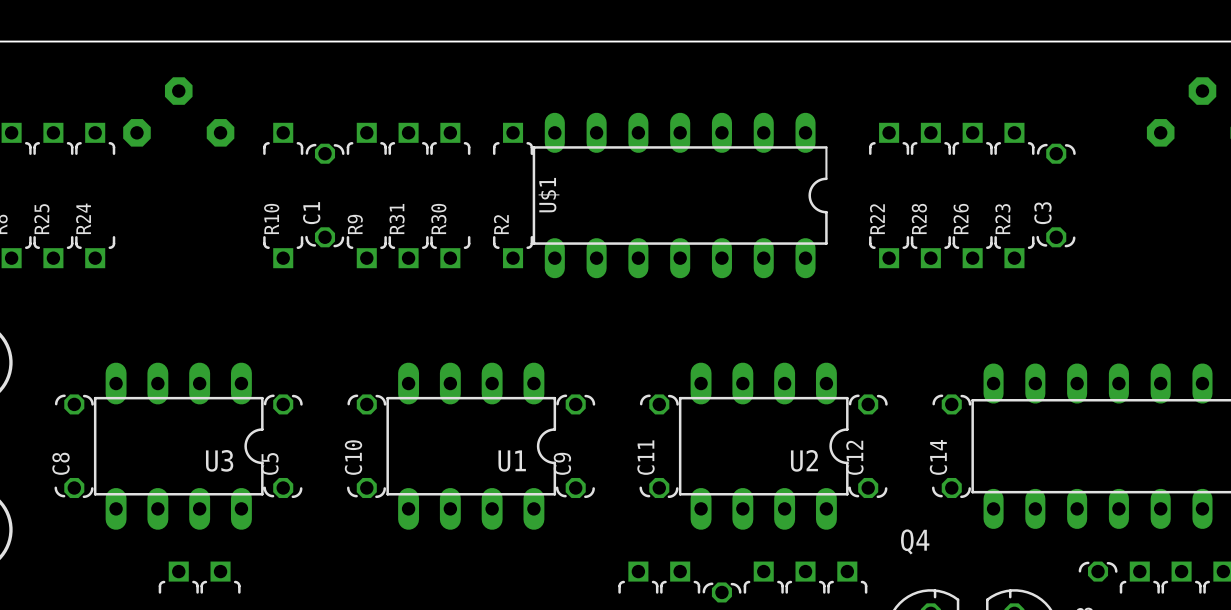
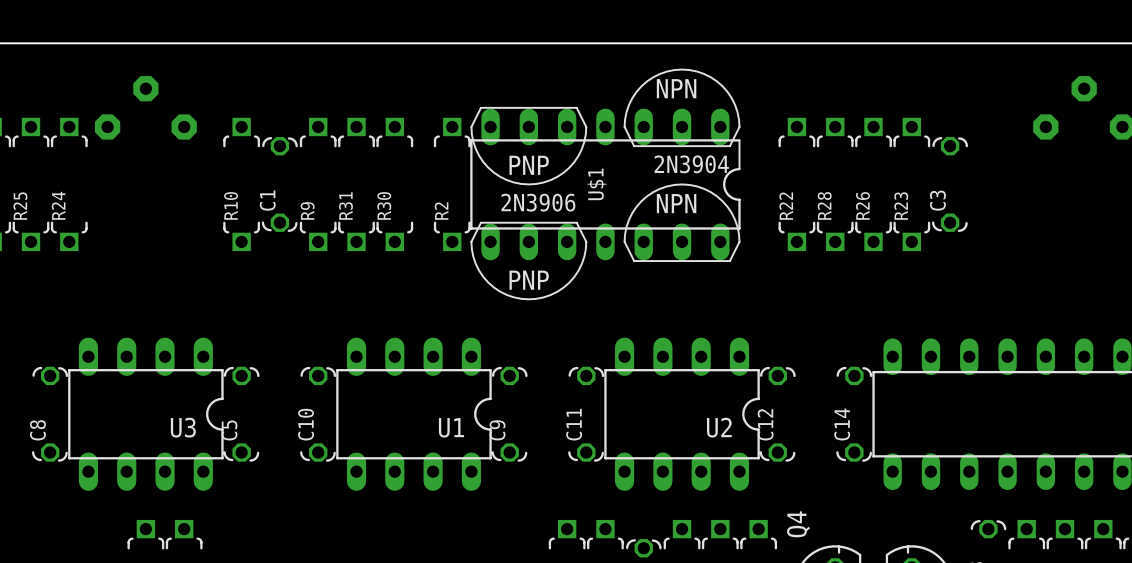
U$1 footprint: [532, 112, 828, 279] -> [470, 68, 741, 301]
U$1 name position: U$1 (548, 195) -> U$1 (597, 184)
Q4 name rotation: 0° (915, 541) -> 90° counterclockwise (798, 524)

